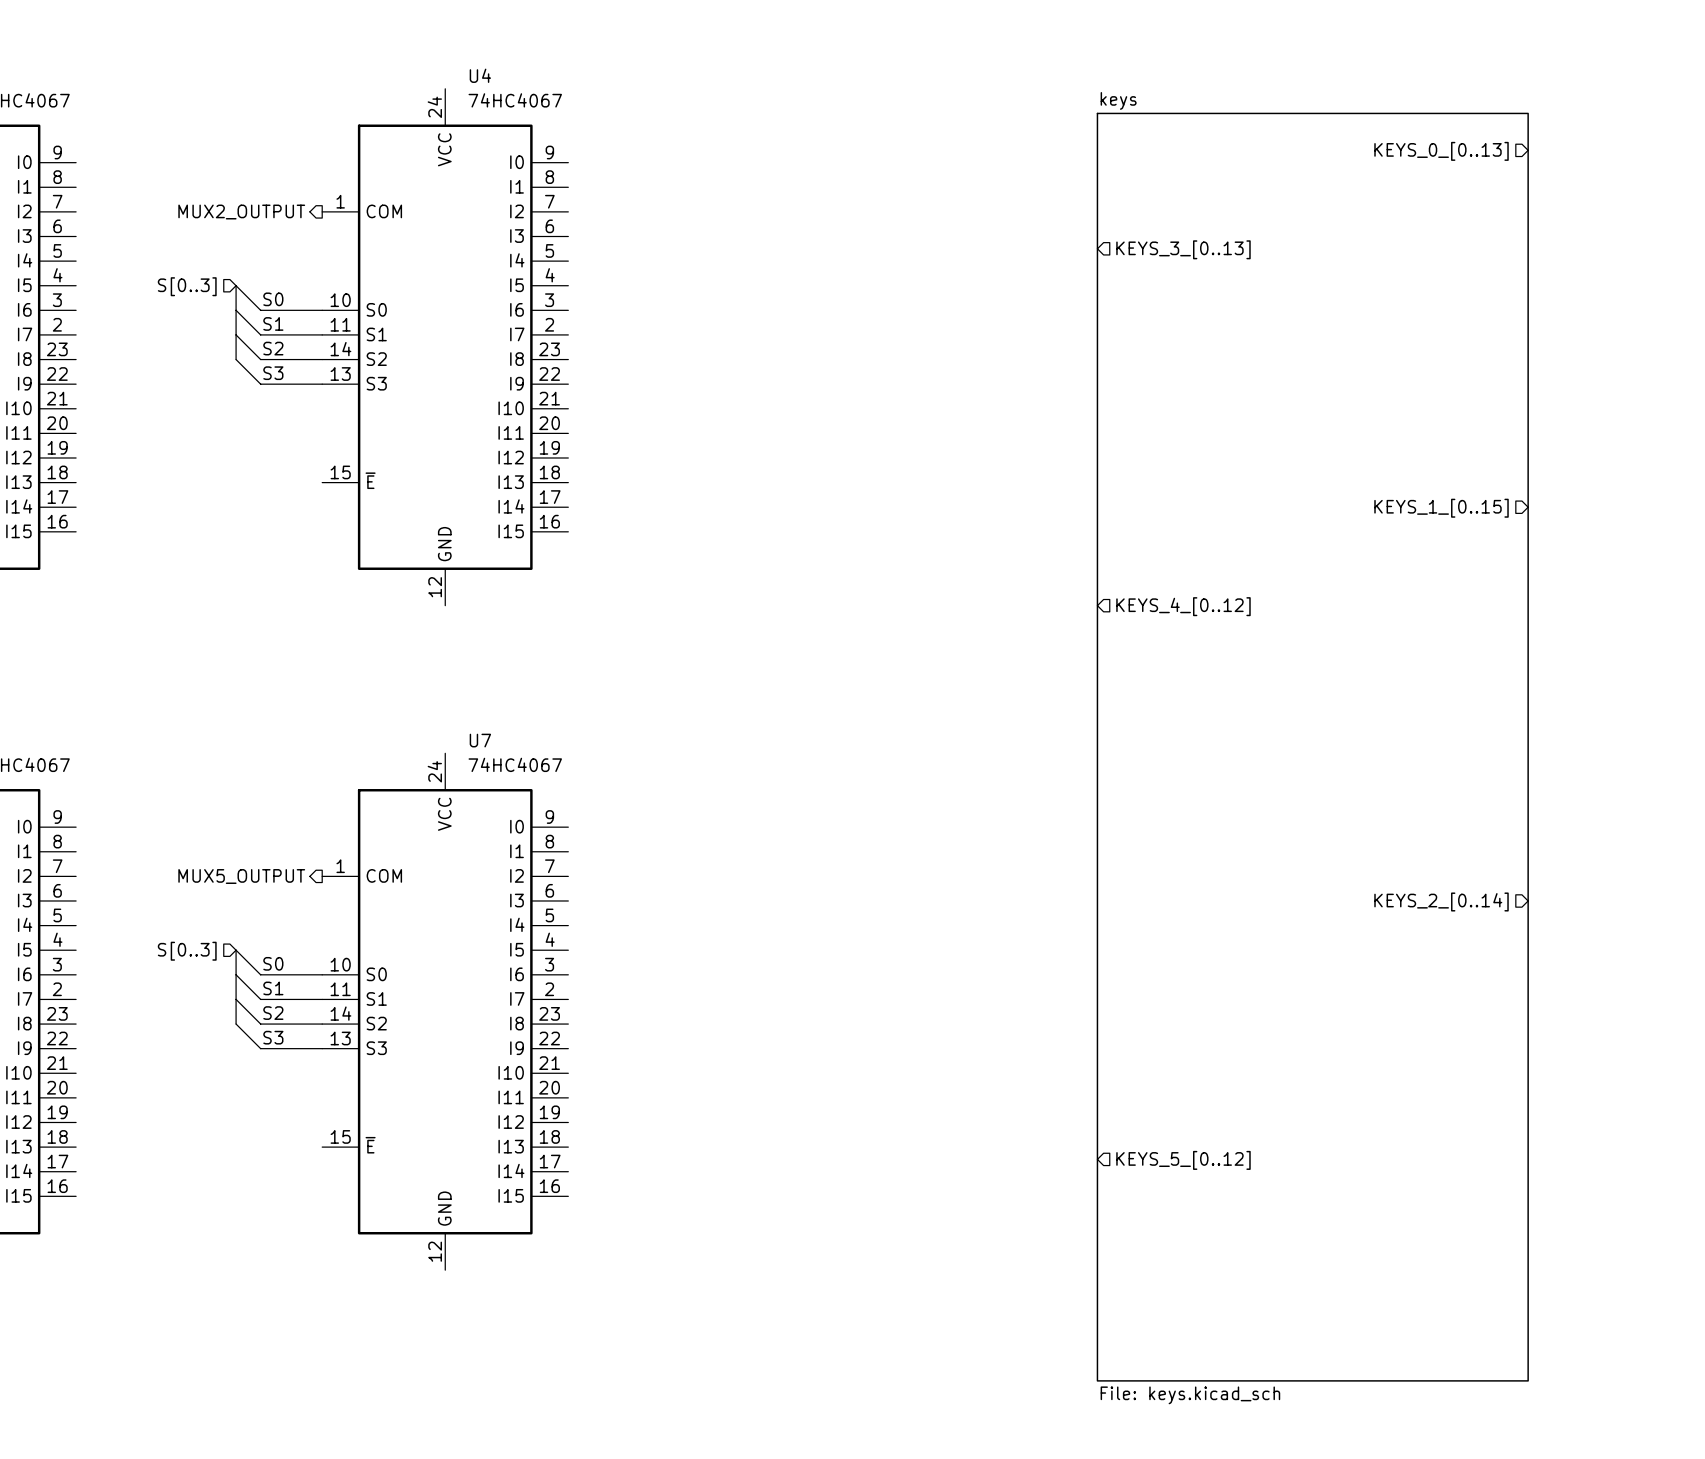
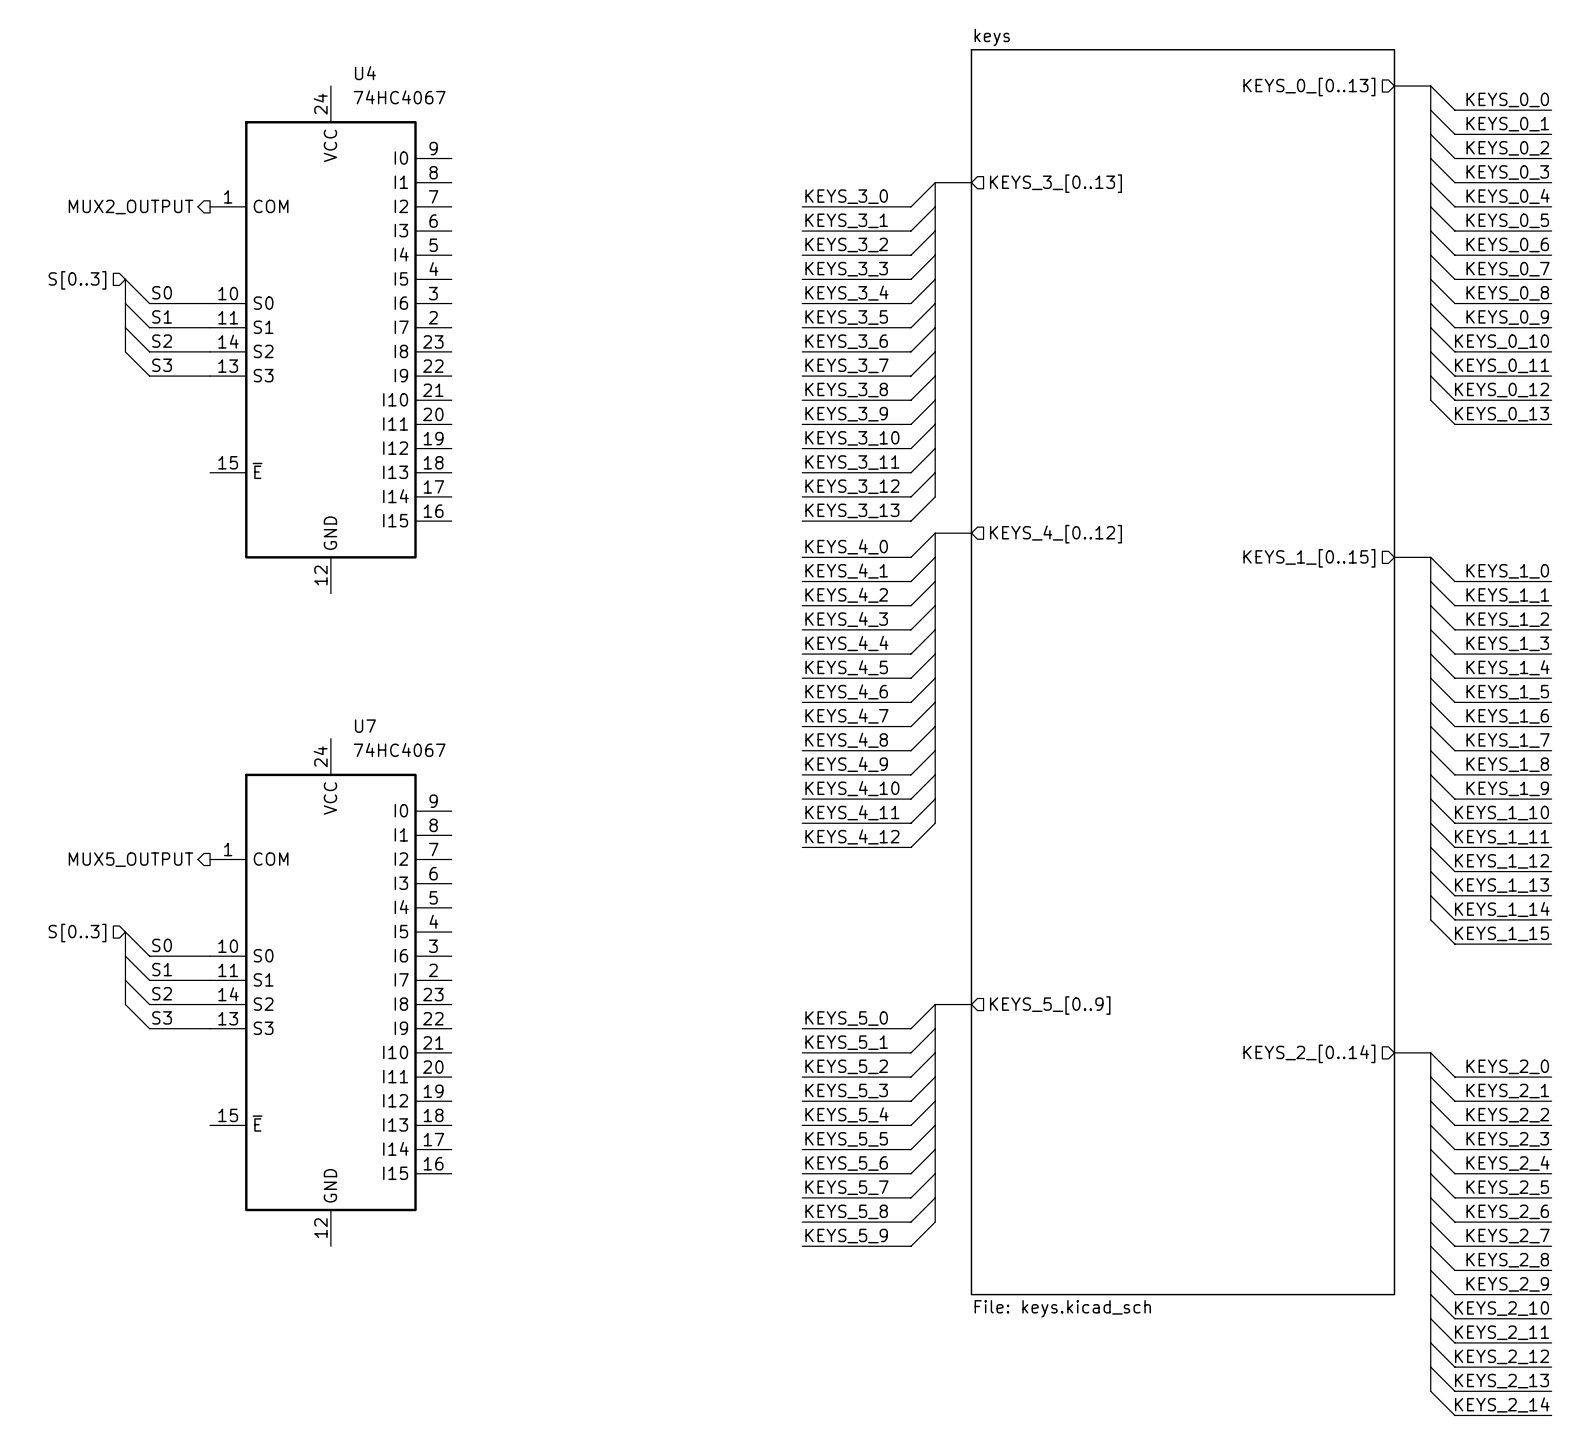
bus: none -> (1394, 86) (1430, 86) (1430, 400)
wire: none -> (1430, 86) (1454, 110) (1551, 110)
label: none -> KEYS_0_0 (1507, 99)
wire: none -> (1430, 110) (1454, 134) (1551, 134)
label: none -> KEYS_0_1 (1507, 124)
wire: none -> (1430, 134) (1454, 158) (1551, 158)
sheet pin position: KEYS_0_[0..13] (1441, 151) -> KEYS_0_[0..13] (1309, 86)
label: none -> KEYS_0_2 (1507, 148)
wire: none -> (1430, 158) (1454, 182) (1551, 182)
label: none -> KEYS_0_3 (1507, 172)
wire: none -> (935, 182) (911, 206) (802, 206)
bus: none -> (971, 182) (935, 182) (935, 496)
wire: none -> (1430, 182) (1454, 206) (1551, 206)
label: none -> KEYS_3_0 (846, 196)
label: none -> KEYS_0_4 (1508, 196)
wire: none -> (935, 206) (911, 231) (802, 231)
wire: none -> (1430, 206) (1454, 231) (1551, 231)
label: none -> KEYS_3_1 (846, 220)
label: none -> KEYS_0_5 (1507, 220)
wire: none -> (935, 231) (911, 255) (802, 255)
wire: none -> (1430, 231) (1454, 255) (1551, 255)
sheet pin position: KEYS_3_[0..13] (1183, 249) -> KEYS_3_[0..13] (1055, 183)
label: none -> KEYS_3_2 (846, 245)
label: none -> KEYS_0_6 (1507, 245)
wire: none -> (935, 255) (911, 279) (802, 279)
wire: none -> (1430, 255) (1454, 279) (1551, 279)
label: none -> KEYS_3_3 (846, 269)
label: none -> KEYS_0_7 (1508, 269)
wire: none -> (935, 279) (911, 303) (802, 303)
wire: none -> (1430, 279) (1454, 303) (1551, 303)
label: none -> KEYS_3_4 (846, 293)
label: none -> KEYS_0_8 (1507, 293)
wire: none -> (935, 303) (911, 327) (802, 327)
wire: none -> (1430, 303) (1454, 327) (1551, 327)
label: none -> KEYS_3_5 (846, 317)
label: none -> KEYS_0_9 (1507, 317)
wire: none -> (935, 327) (911, 351) (802, 351)
wire: none -> (1430, 327) (1454, 351) (1551, 351)
label: none -> KEYS_3_6 (846, 341)
label: none -> KEYS_0_10 (1502, 341)
wire: none -> (935, 351) (911, 376) (802, 376)
wire: none -> (1430, 351) (1454, 376) (1551, 376)
label: none -> KEYS_3_7 (846, 365)
label: none -> KEYS_0_11 (1502, 365)
wire: none -> (935, 376) (911, 400) (802, 400)
wire: none -> (1430, 376) (1454, 400) (1551, 400)
label: none -> KEYS_3_8 (846, 390)
label: none -> KEYS_0_12 (1502, 390)
wire: none -> (935, 400) (911, 424) (802, 424)
wire: none -> (1430, 400) (1454, 424) (1551, 424)
label: none -> KEYS_3_9 (846, 414)
label: none -> KEYS_0_13 (1502, 414)
wire: none -> (935, 424) (911, 448) (802, 448)
label: none -> KEYS_3_10 (852, 438)
wire: none -> (935, 448) (911, 472) (802, 472)
label: none -> KEYS_3_11 (852, 462)
wire: none -> (935, 472) (911, 496) (802, 496)
label: none -> KEYS_3_12 (852, 486)
wire: none -> (935, 496) (911, 521) (802, 521)
sheet pin position: KEYS_1_[0..15] (1441, 508) -> KEYS_1_[0..15] (1309, 558)
label: none -> KEYS_3_13 (852, 510)
wire: none -> (935, 533) (911, 557) (802, 557)
bus: none -> (971, 533) (935, 533) (935, 823)
label: none -> KEYS_4_0 (846, 546)
wire: none -> (935, 557) (911, 581) (802, 581)
bus: none -> (1394, 557) (1430, 557) (1430, 919)
wire: none -> (1430, 557) (1454, 581) (1551, 581)
label: none -> KEYS_4_1 (846, 571)
label: none -> KEYS_1_0 (1507, 571)
wire: none -> (935, 581) (911, 605) (802, 605)
wire: none -> (1430, 581) (1454, 605) (1551, 605)
sheet pin position: KEYS_4_[0..12] (1183, 606) -> KEYS_4_[0..12] (1055, 534)
label: none -> KEYS_4_2 (846, 595)
label: none -> KEYS_1_1 (1507, 595)
wire: none -> (935, 605) (911, 629) (802, 629)
wire: none -> (1430, 605) (1454, 629) (1551, 629)
label: none -> KEYS_4_3 (846, 619)
label: none -> KEYS_1_2 (1507, 619)
wire: none -> (935, 629) (911, 654) (802, 654)
wire: none -> (1430, 629) (1454, 654) (1551, 654)
label: none -> KEYS_4_4 (846, 643)
label: none -> KEYS_1_3 (1507, 643)
wire: none -> (935, 654) (911, 678) (802, 678)
wire: none -> (1430, 654) (1454, 678) (1551, 678)
label: none -> KEYS_4_5 (846, 667)
label: none -> KEYS_1_4 (1508, 667)
wire: none -> (935, 678) (911, 702) (802, 702)
wire: none -> (1430, 678) (1454, 702) (1551, 702)
label: none -> KEYS_4_6 (846, 691)
label: none -> KEYS_1_5 (1507, 692)
wire: none -> (935, 702) (911, 726) (802, 726)
wire: none -> (1430, 702) (1454, 726) (1551, 726)
label: none -> KEYS_4_7 (846, 716)
label: none -> KEYS_1_6 (1507, 716)
wire: none -> (935, 726) (911, 750) (802, 750)
wire: none -> (1430, 726) (1454, 750) (1551, 750)
sheet keys position: (1312, 747) -> (1182, 672)
label: none -> KEYS_4_8 (846, 740)
label: none -> KEYS_1_7 (1508, 740)
wire: none -> (935, 750) (911, 774) (802, 774)
wire: none -> (1430, 750) (1454, 774) (1551, 774)
label: none -> KEYS_4_9 (846, 764)
label: none -> KEYS_1_8 (1507, 764)
wire: none -> (935, 774) (911, 799) (802, 799)
wire: none -> (1430, 774) (1454, 799) (1551, 799)
label: none -> KEYS_4_10 (852, 788)
label: none -> KEYS_1_9 (1507, 788)
wire: none -> (935, 799) (911, 823) (802, 823)
wire: none -> (1430, 799) (1454, 823) (1551, 823)
label: none -> KEYS_4_11 (852, 812)
label: none -> KEYS_1_10 (1502, 813)
wire: none -> (935, 823) (911, 847) (802, 847)
wire: none -> (1430, 823) (1454, 847) (1551, 847)
label: none -> KEYS_4_12 (852, 836)
label: none -> KEYS_1_11 (1502, 837)
wire: none -> (1430, 847) (1454, 871) (1551, 871)
label: none -> KEYS_1_12 (1502, 861)
wire: none -> (1430, 871) (1454, 895) (1551, 895)
sheet pin position: KEYS_2_[0..14] (1441, 901) -> KEYS_2_[0..14] (1309, 1053)
label: none -> KEYS_1_13 (1502, 885)
wire: none -> (1430, 895) (1454, 919) (1551, 919)
label: none -> KEYS_1_14 (1502, 909)
wire: none -> (1430, 919) (1454, 944) (1551, 944)
label: none -> KEYS_1_15 (1502, 933)
wire: none -> (935, 1004) (911, 1028) (802, 1028)
bus: none -> (971, 1004) (935, 1004) (935, 1222)
sheet pin: none -> KEYS_5_[0..9] (1050, 1005)
label: none -> KEYS_5_0 (846, 1018)
wire: none -> (935, 1028) (911, 1052) (802, 1052)
label: none -> KEYS_5_1 (846, 1042)
wire: none -> (935, 1052) (911, 1077) (802, 1077)
bus: none -> (1394, 1052) (1430, 1052) (1430, 1391)
wire: none -> (1430, 1052) (1454, 1077) (1551, 1077)
label: none -> KEYS_5_2 (846, 1066)
label: none -> KEYS_2_0 (1507, 1066)
wire: none -> (935, 1077) (911, 1101) (802, 1101)
wire: none -> (1430, 1077) (1454, 1101) (1551, 1101)
label: none -> KEYS_5_3 (846, 1091)
label: none -> KEYS_2_1 (1507, 1091)
wire: none -> (935, 1101) (911, 1125) (802, 1125)
wire: none -> (1430, 1101) (1454, 1125) (1551, 1125)
label: none -> KEYS_5_4 (846, 1114)
label: none -> KEYS_2_2 (1507, 1115)
wire: none -> (935, 1125) (911, 1149) (802, 1149)
wire: none -> (1430, 1125) (1454, 1149) (1551, 1149)
sheet pin: KEYS_5_[0..12] (1183, 1160) -> none
label: none -> KEYS_5_5 (846, 1139)
label: none -> KEYS_2_3 (1507, 1139)
wire: none -> (935, 1149) (911, 1173) (802, 1173)
wire: none -> (1430, 1149) (1454, 1173) (1551, 1173)
label: none -> KEYS_5_6 (846, 1163)
label: none -> KEYS_2_4 (1508, 1163)
wire: none -> (935, 1173) (911, 1197) (802, 1197)
wire: none -> (1430, 1173) (1454, 1197) (1551, 1197)
label: none -> KEYS_5_7 (846, 1187)
label: none -> KEYS_2_5 (1507, 1187)
wire: none -> (935, 1197) (911, 1222) (802, 1222)
wire: none -> (1430, 1197) (1454, 1222) (1551, 1222)
label: none -> KEYS_5_8 (846, 1211)
label: none -> KEYS_2_6 (1507, 1211)
wire: none -> (935, 1222) (911, 1246) (802, 1246)
wire: none -> (1430, 1222) (1454, 1246) (1551, 1246)
label: none -> KEYS_5_9 (846, 1236)
label: none -> KEYS_2_7 (1508, 1236)
wire: none -> (1430, 1246) (1454, 1270) (1551, 1270)
label: none -> KEYS_2_8 (1507, 1260)
wire: none -> (1430, 1270) (1454, 1294) (1551, 1294)
label: none -> KEYS_2_9 (1507, 1284)
wire: none -> (1430, 1294) (1454, 1318) (1551, 1318)
label: none -> KEYS_2_10 (1502, 1308)
wire: none -> (1430, 1318) (1454, 1342) (1551, 1342)
label: none -> KEYS_2_11 (1502, 1332)
wire: none -> (1430, 1342) (1454, 1367) (1551, 1367)
label: none -> KEYS_2_12 (1502, 1356)
wire: none -> (1430, 1367) (1454, 1391) (1551, 1391)
label: none -> KEYS_2_13 (1502, 1381)
wire: none -> (1430, 1391) (1454, 1415) (1551, 1415)
label: none -> KEYS_2_14 (1502, 1404)

